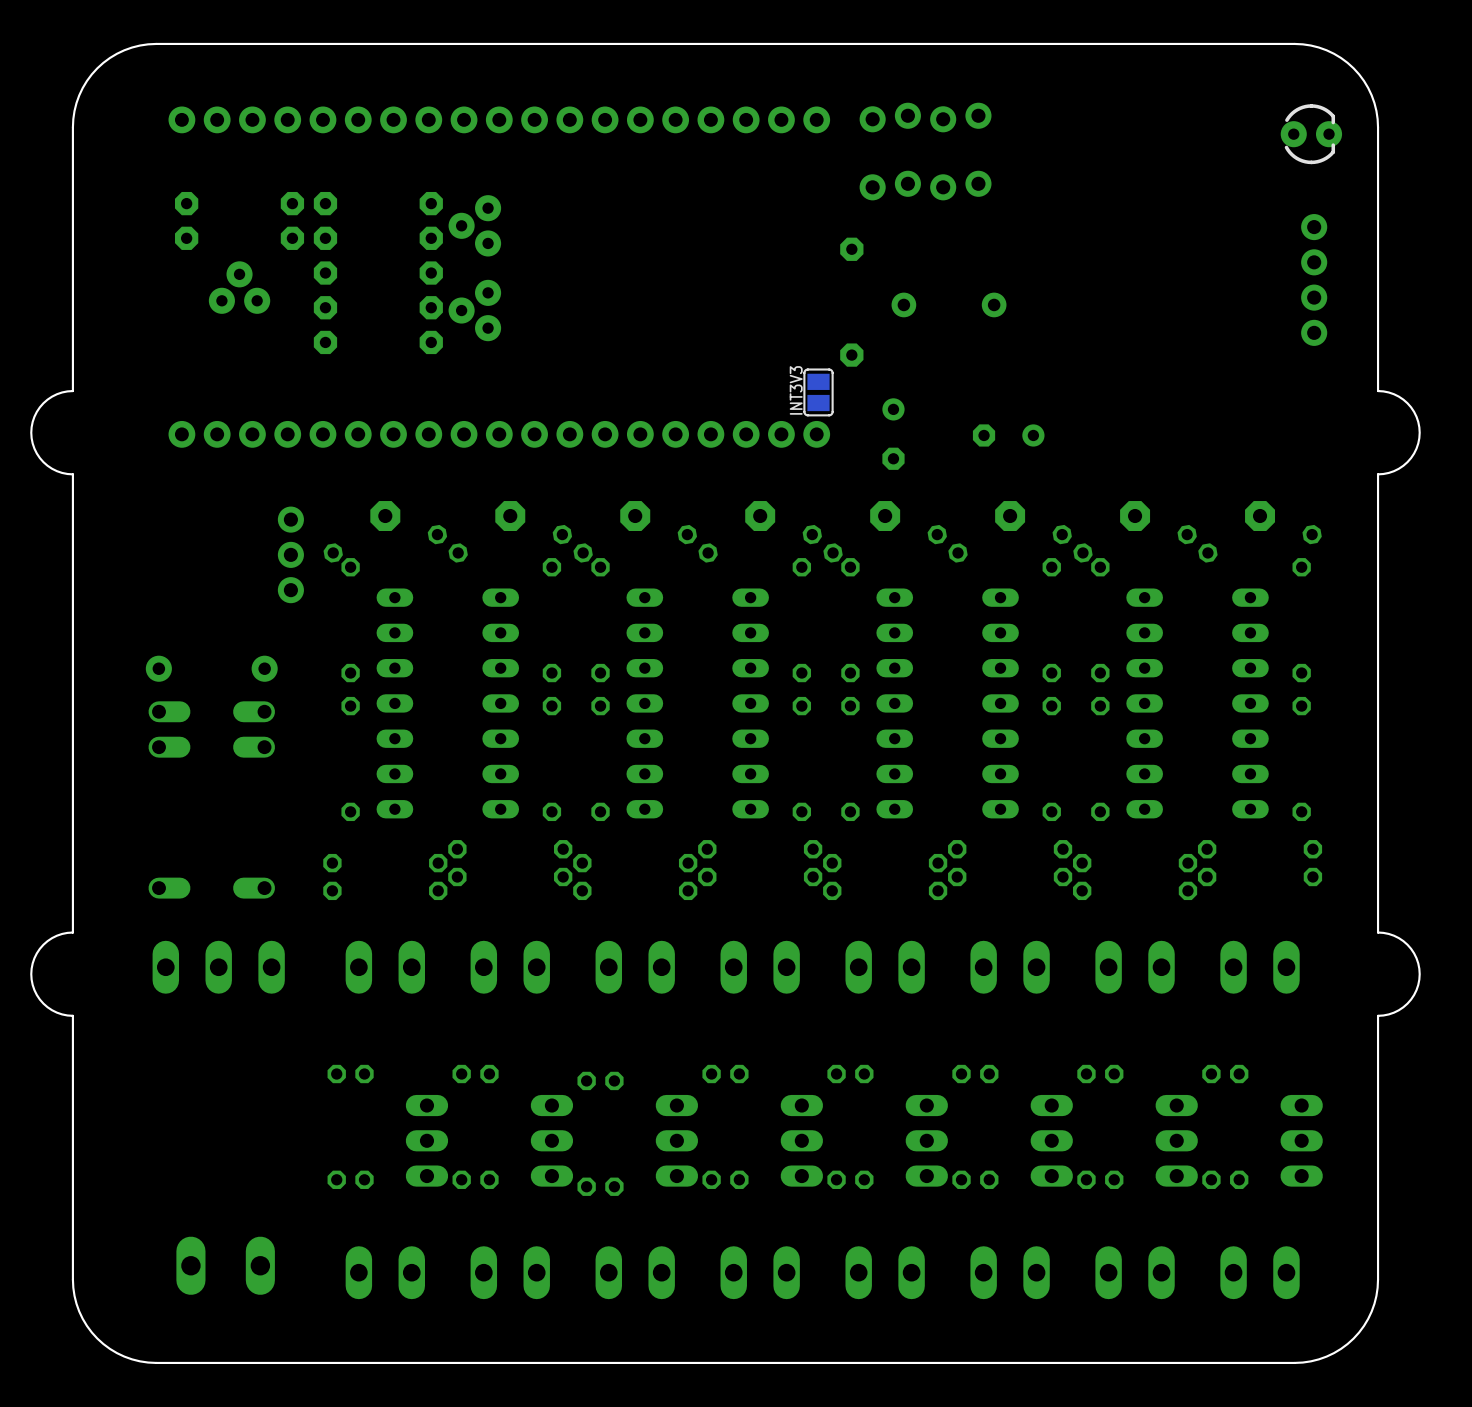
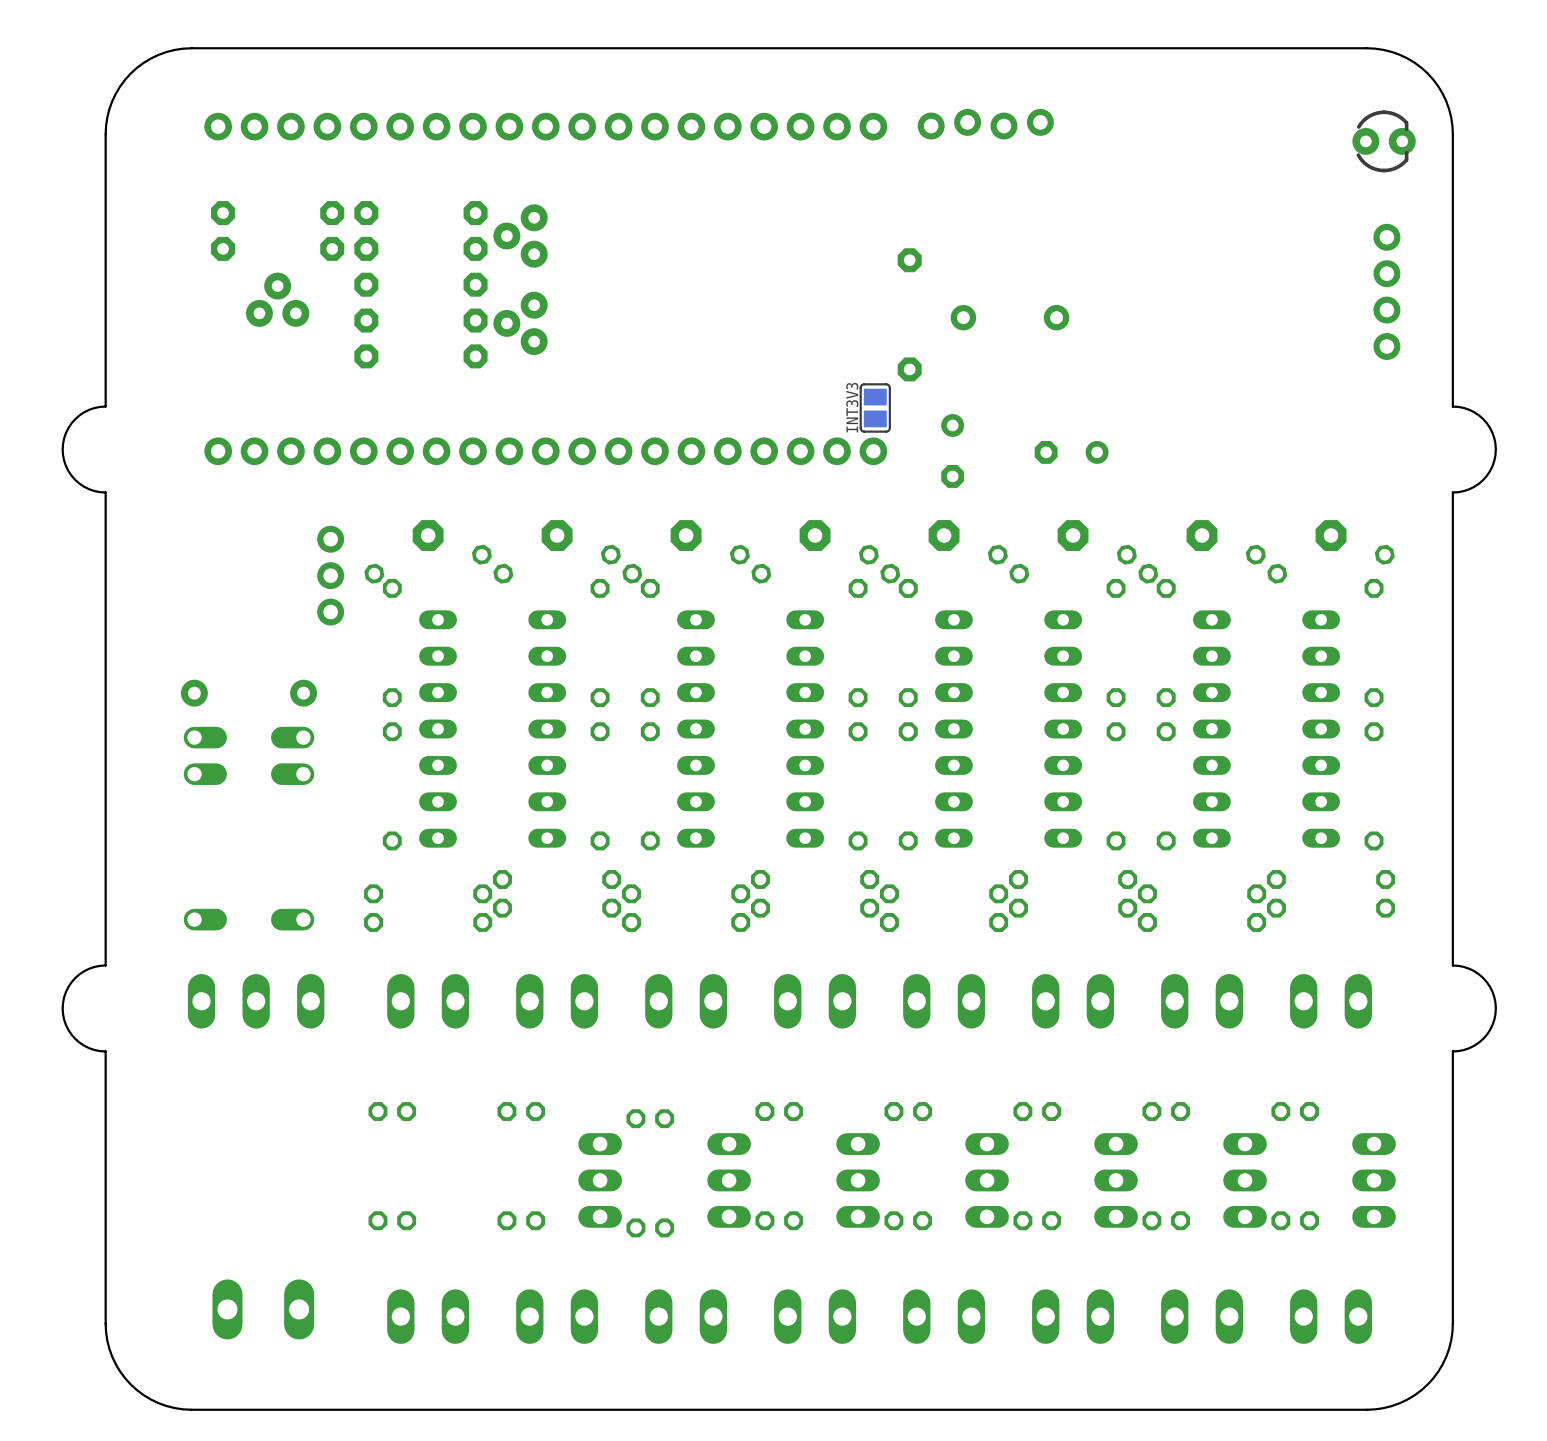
part: (925, 185) -> none
part: (426, 1140) -> none

